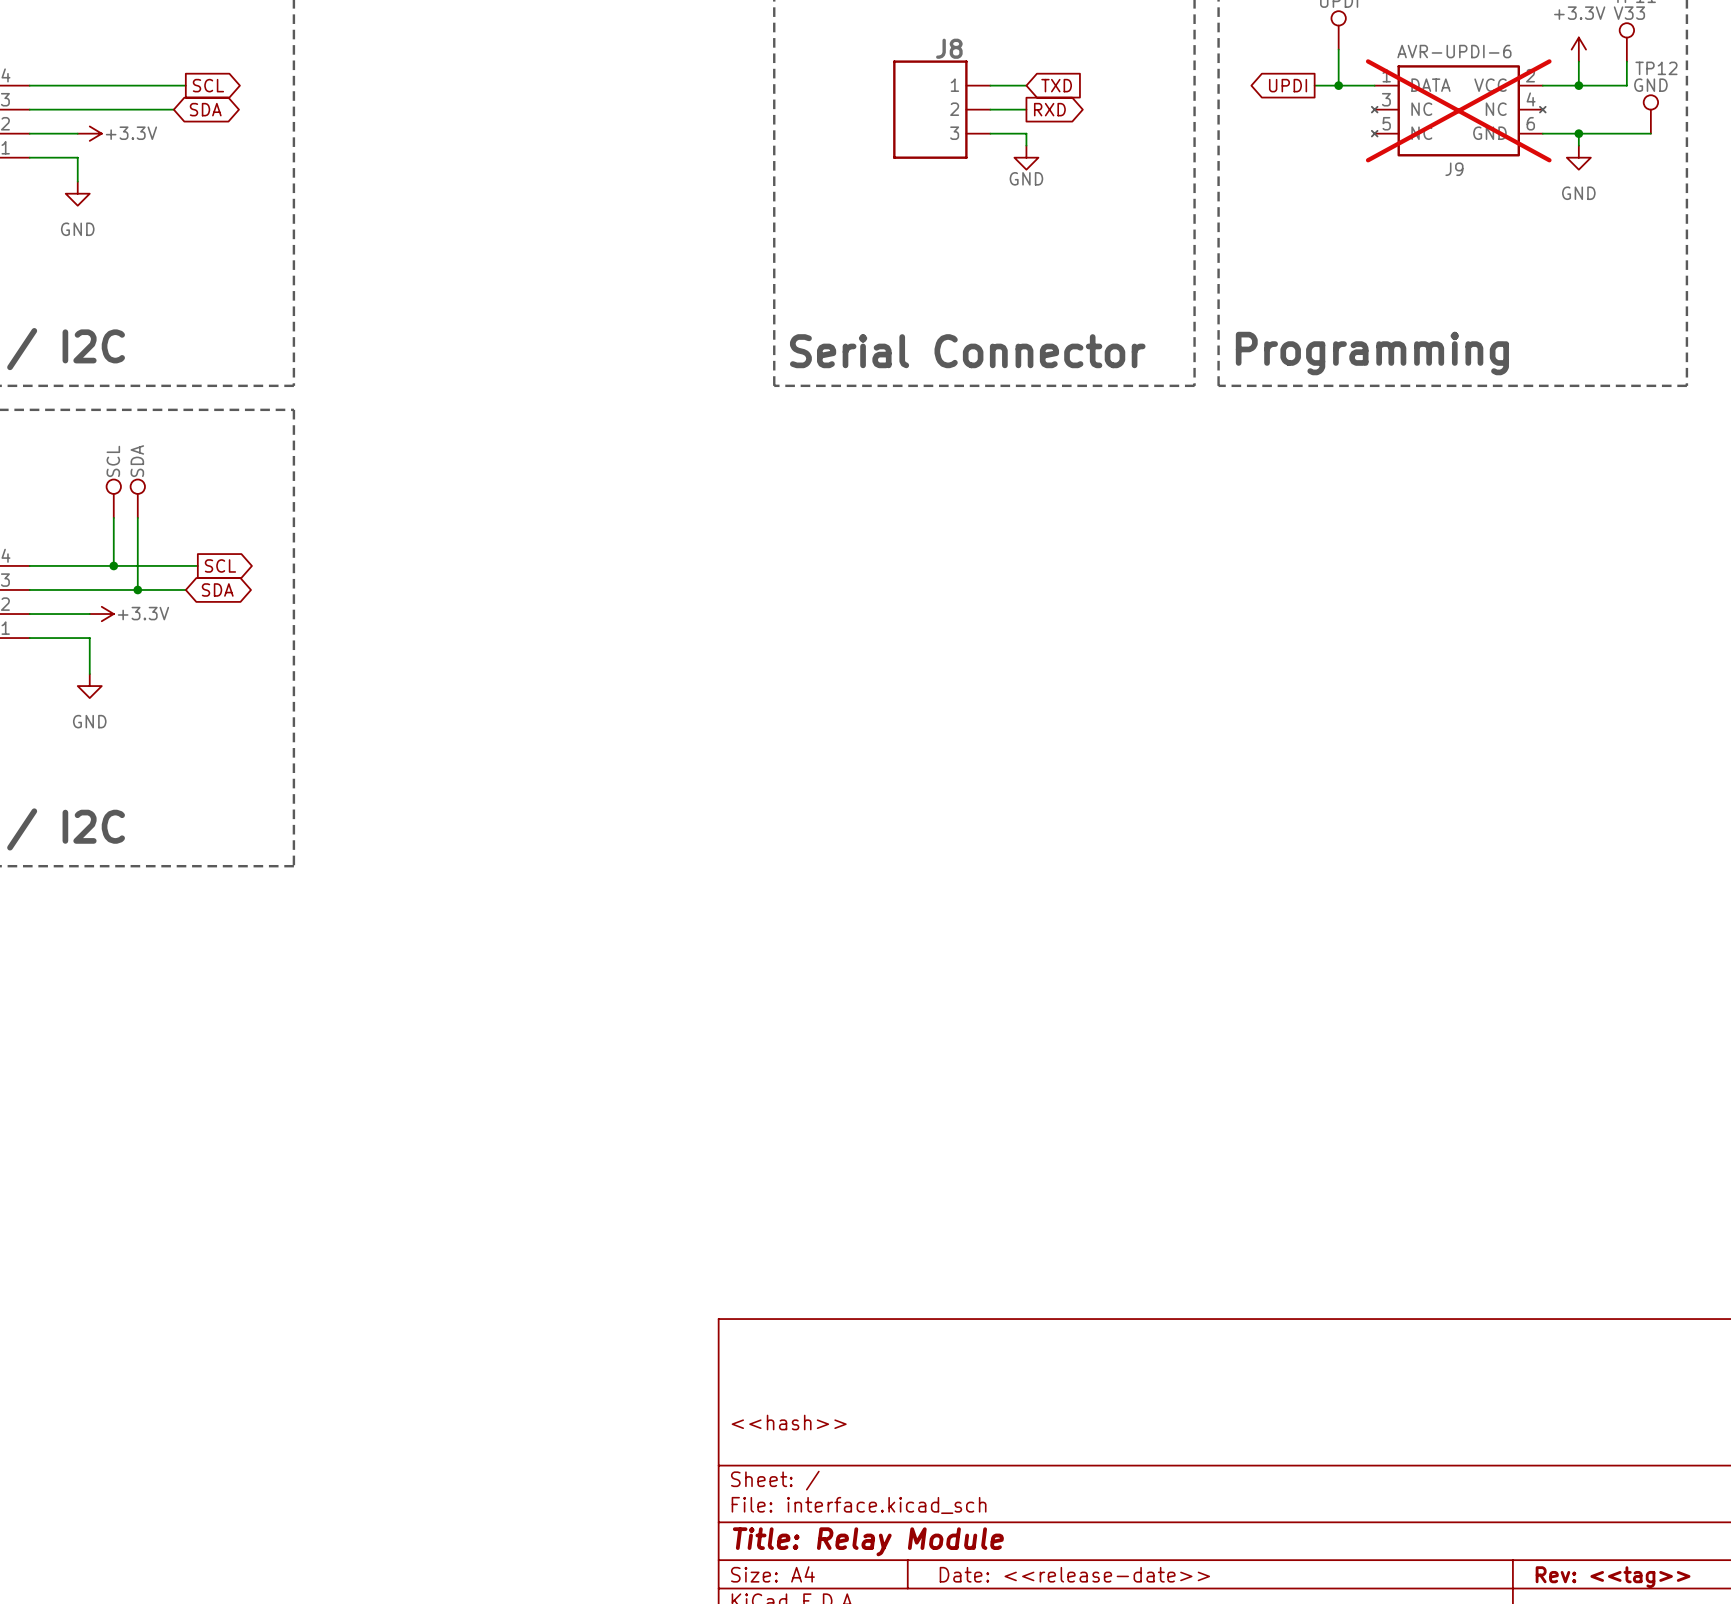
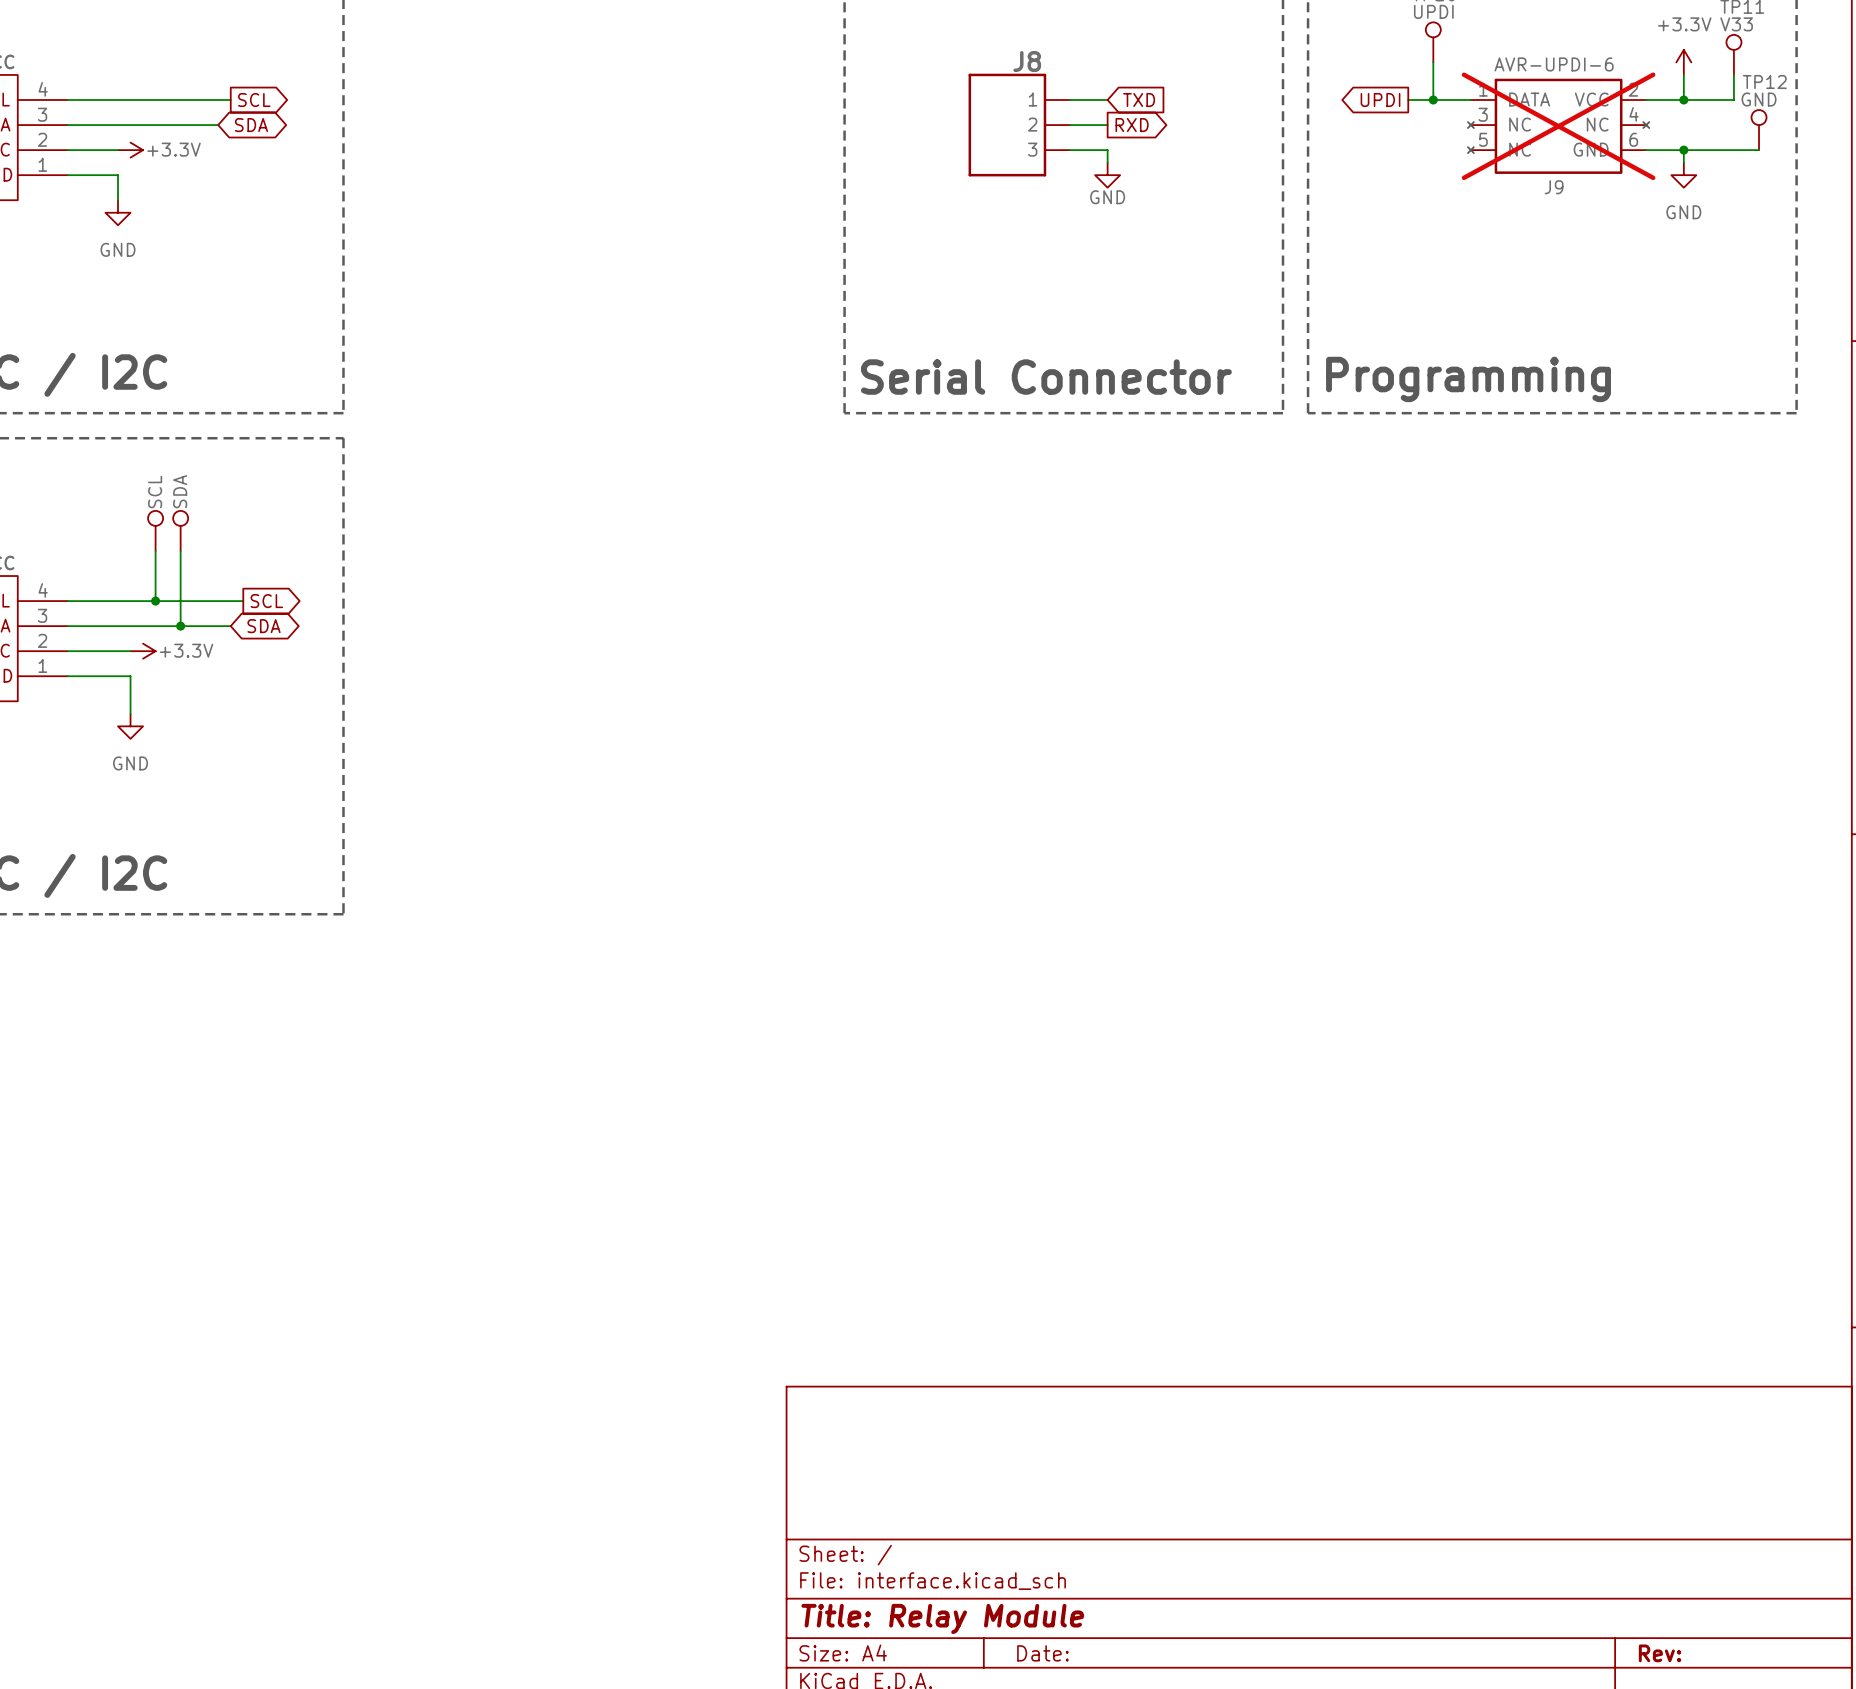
title block: <<hash>> (789, 1422) -> none
title block: Date: <<release-date>> (1074, 1574) -> Date: (1042, 1653)
title block: Rev: <<tag>> (1613, 1577) -> Rev: (1660, 1653)

